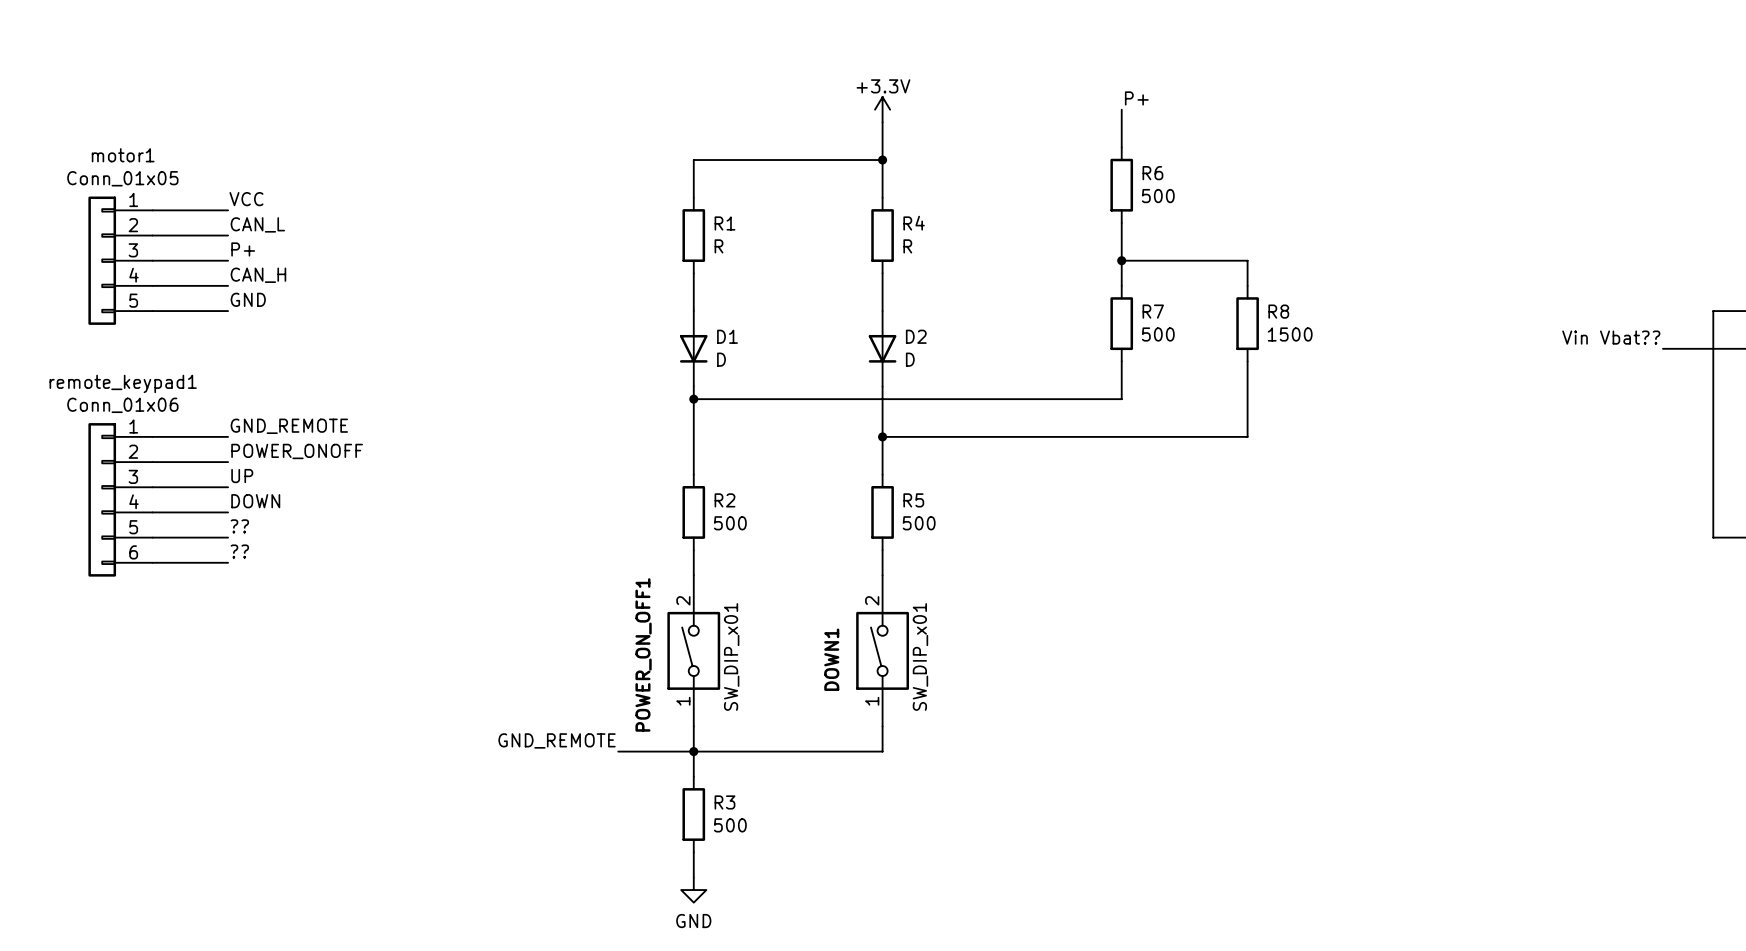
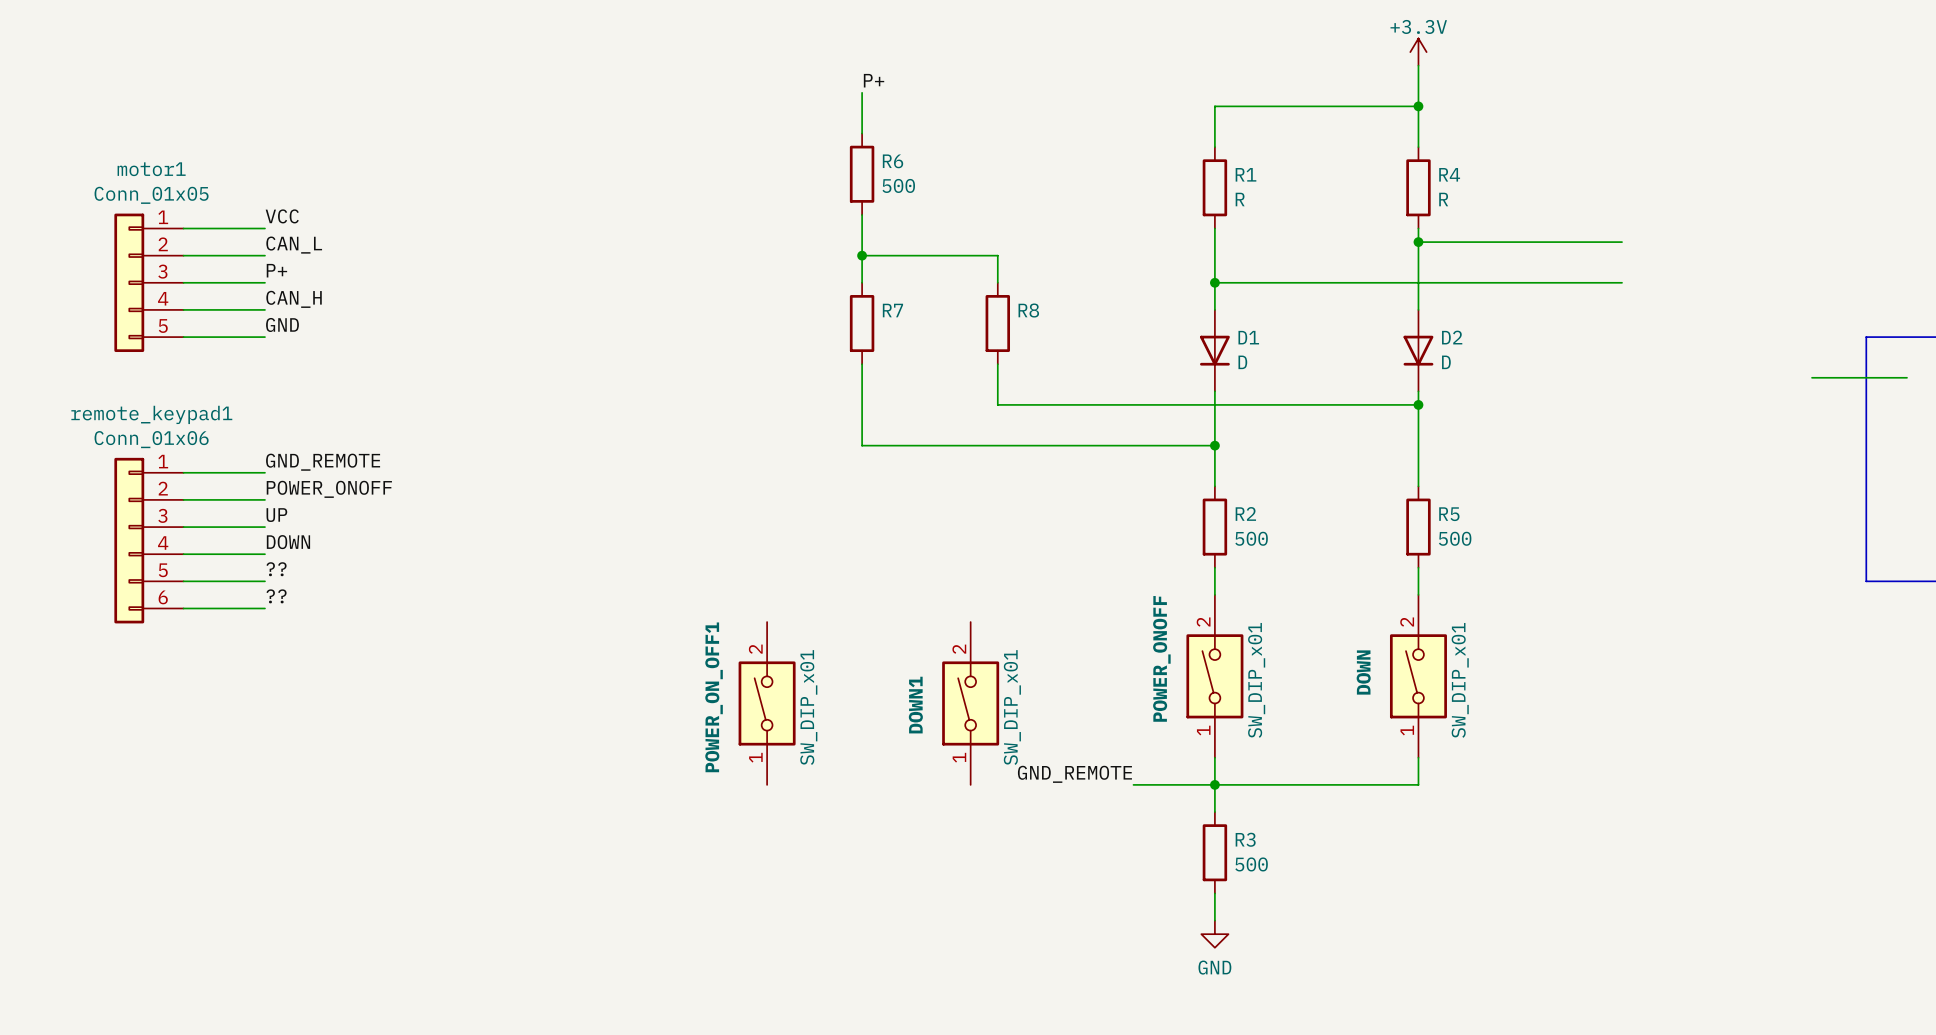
power symbol: none -> +3.3V (1418, 52)
wire: none -> (1418, 65) (1418, 147)
label: none -> P+ (874, 80)
wire: none -> (1418, 106) (1214, 106) (1214, 147)
junction: none -> (1418, 106)
label: P+ (1136, 98) -> none
power symbol: +3.3V (882, 109) -> none
wire: (1121, 109) (1121, 147) -> none
wire: (882, 122) (882, 197) -> (1214, 228) (1214, 309)
wire: (882, 160) (693, 160) (693, 197) -> none
junction: (882, 160) -> none
R6 position: (1121, 185) -> (862, 174)
wire: none -> (862, 214) (862, 282)
wire: none -> (1418, 228) (1418, 309)
wire: (1121, 222) (1121, 285) -> none
wire: none -> (1418, 242) (1622, 242)
junction: none -> (1418, 242)
R1 position: (693, 235) -> (1214, 187)
wire: none -> (862, 255) (997, 255) (997, 282)
junction: none -> (862, 255)
R4 position: (882, 235) -> (1418, 187)
wire: none -> (1214, 282) (1228, 282)
junction position: (1121, 260) -> (1214, 282)
wire: (1247, 260) (1247, 285) -> (1364, 282) (1622, 282)
wire: (693, 273) (693, 311) -> (862, 92) (862, 133)
wire: (882, 273) (882, 311) -> none
R7 position: (1121, 323) -> (862, 323)
R8 position: (1247, 323) -> (997, 323)
R7 value: 500 (1158, 334) -> none
R8 value: 1500 (1290, 334) -> none
wire: none -> (862, 364) (862, 445) (1214, 445)
wire: none -> (997, 364) (997, 404) (1418, 404)
label: Vin Vbat?? (1611, 337) -> none
D1 position: (693, 348) -> (1214, 350)
D2 position: (882, 348) -> (1418, 350)
wire: (1121, 361) (1121, 399) (693, 399) -> none
wire: (1247, 361) (1247, 436) (882, 436) -> none
wire: none -> (1418, 391) (1418, 486)
junction: none -> (1418, 404)
wire: (693, 386) (693, 474) -> none
wire: (882, 386) (882, 474) -> (1214, 391) (1214, 486)
junction: (693, 399) -> none
junction: none -> (1214, 445)
junction: (882, 436) -> none
R2 position: (693, 512) -> (1214, 527)
R5 position: (882, 512) -> (1418, 527)
wire: none -> (1418, 567) (1418, 594)
wire: (693, 550) (693, 575) -> none
wire: (882, 550) (882, 575) -> (1214, 567) (1214, 594)
POWER_ONOFF: none -> SW_DIP_x01 (1214, 676)
DOWN: none -> SW_DIP_x01 (1418, 676)
wire: none -> (1214, 757) (1214, 812)
wire: none -> (1418, 757) (1418, 784) (1133, 784)
label: none -> GND_REMOTE (1074, 774)
wire: (693, 726) (693, 776) -> none
wire: (882, 726) (882, 751) (618, 751) -> none
junction: none -> (1214, 784)
label: GND_REMOTE (557, 740) -> none
junction: (693, 751) -> none
R3 position: (693, 814) -> (1214, 852)
wire: none -> (1214, 893) (1214, 920)
wire: (693, 852) (693, 877) -> none
power symbol: none -> GND (1214, 934)
power symbol: GND (693, 890) -> none

